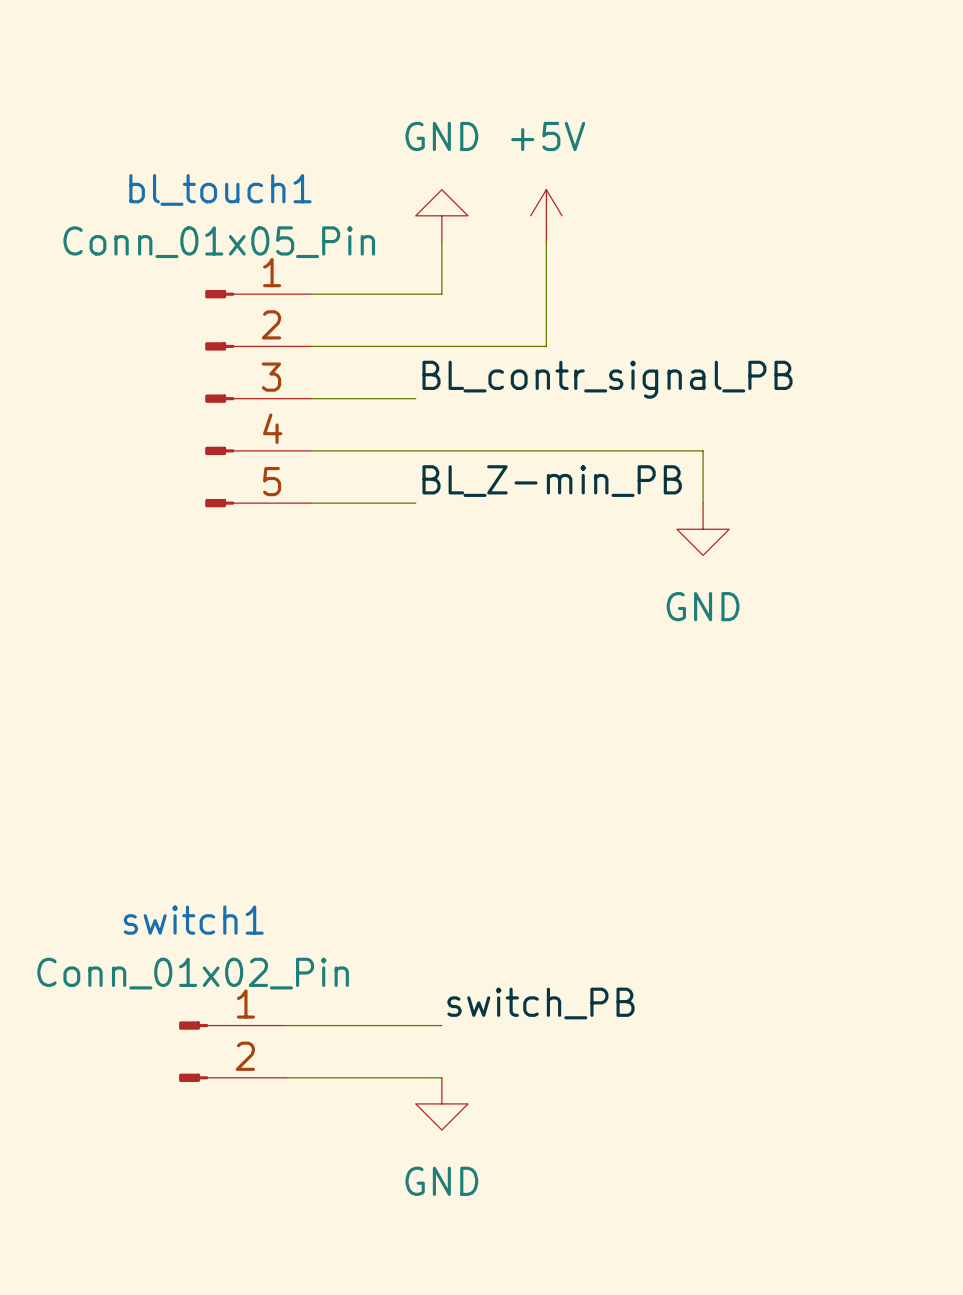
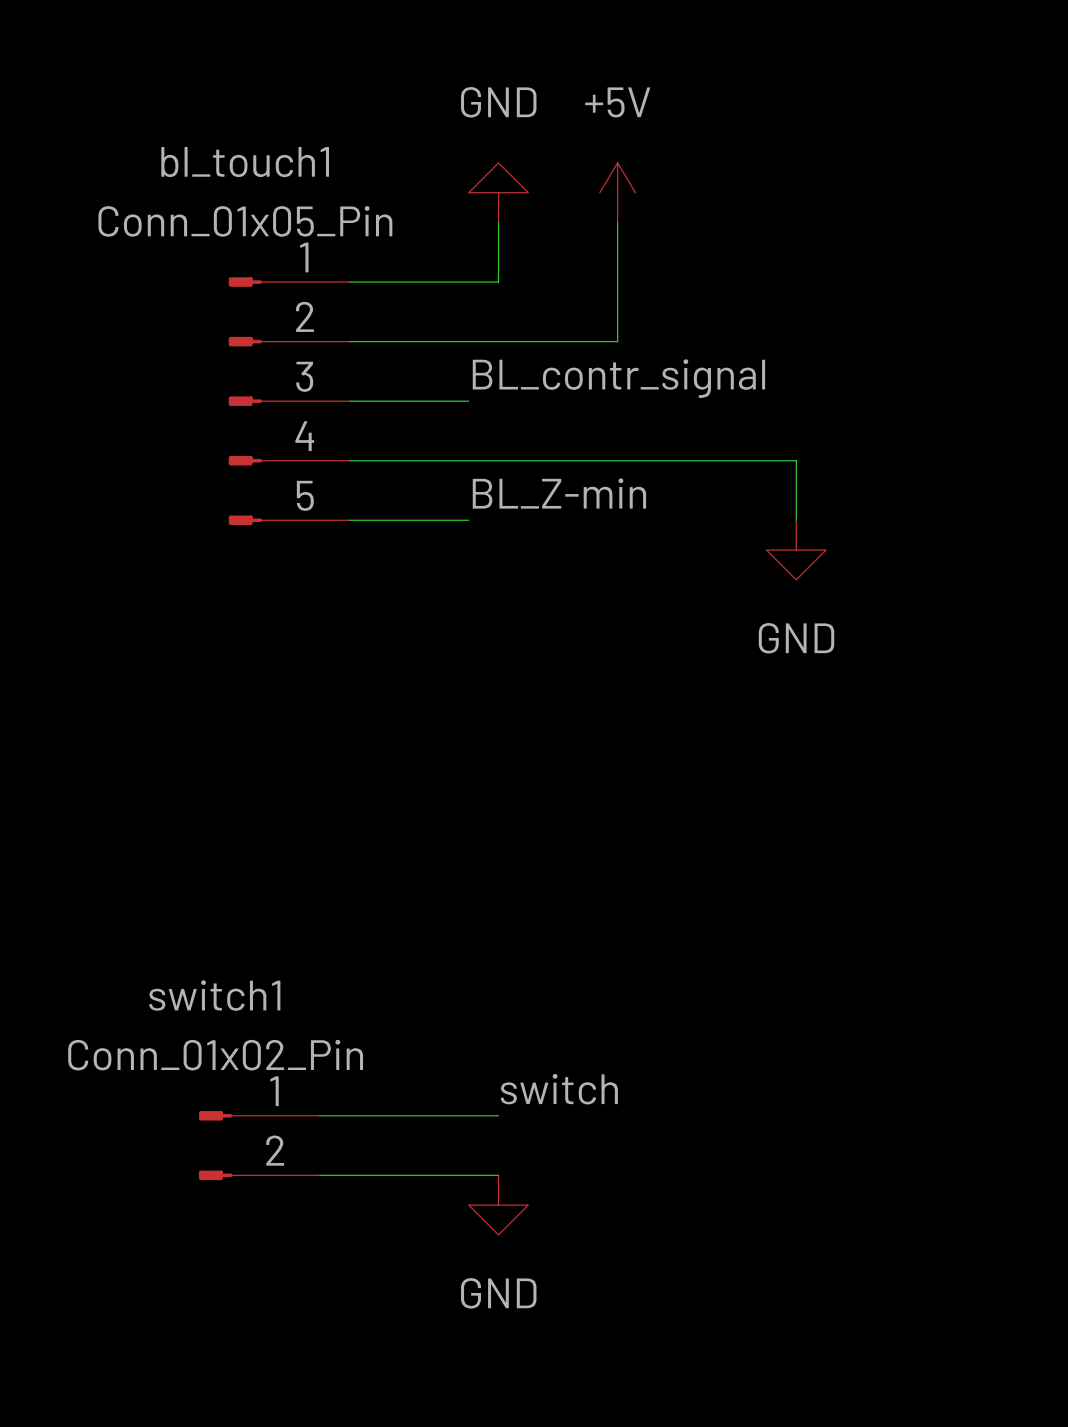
label: BL_contr_signal_PB (607, 379) -> BL_contr_signal (618, 378)
label: BL_Z-min_PB (552, 481) -> BL_Z-min (559, 493)
label: switch_PB (540, 1003) -> switch (559, 1089)

